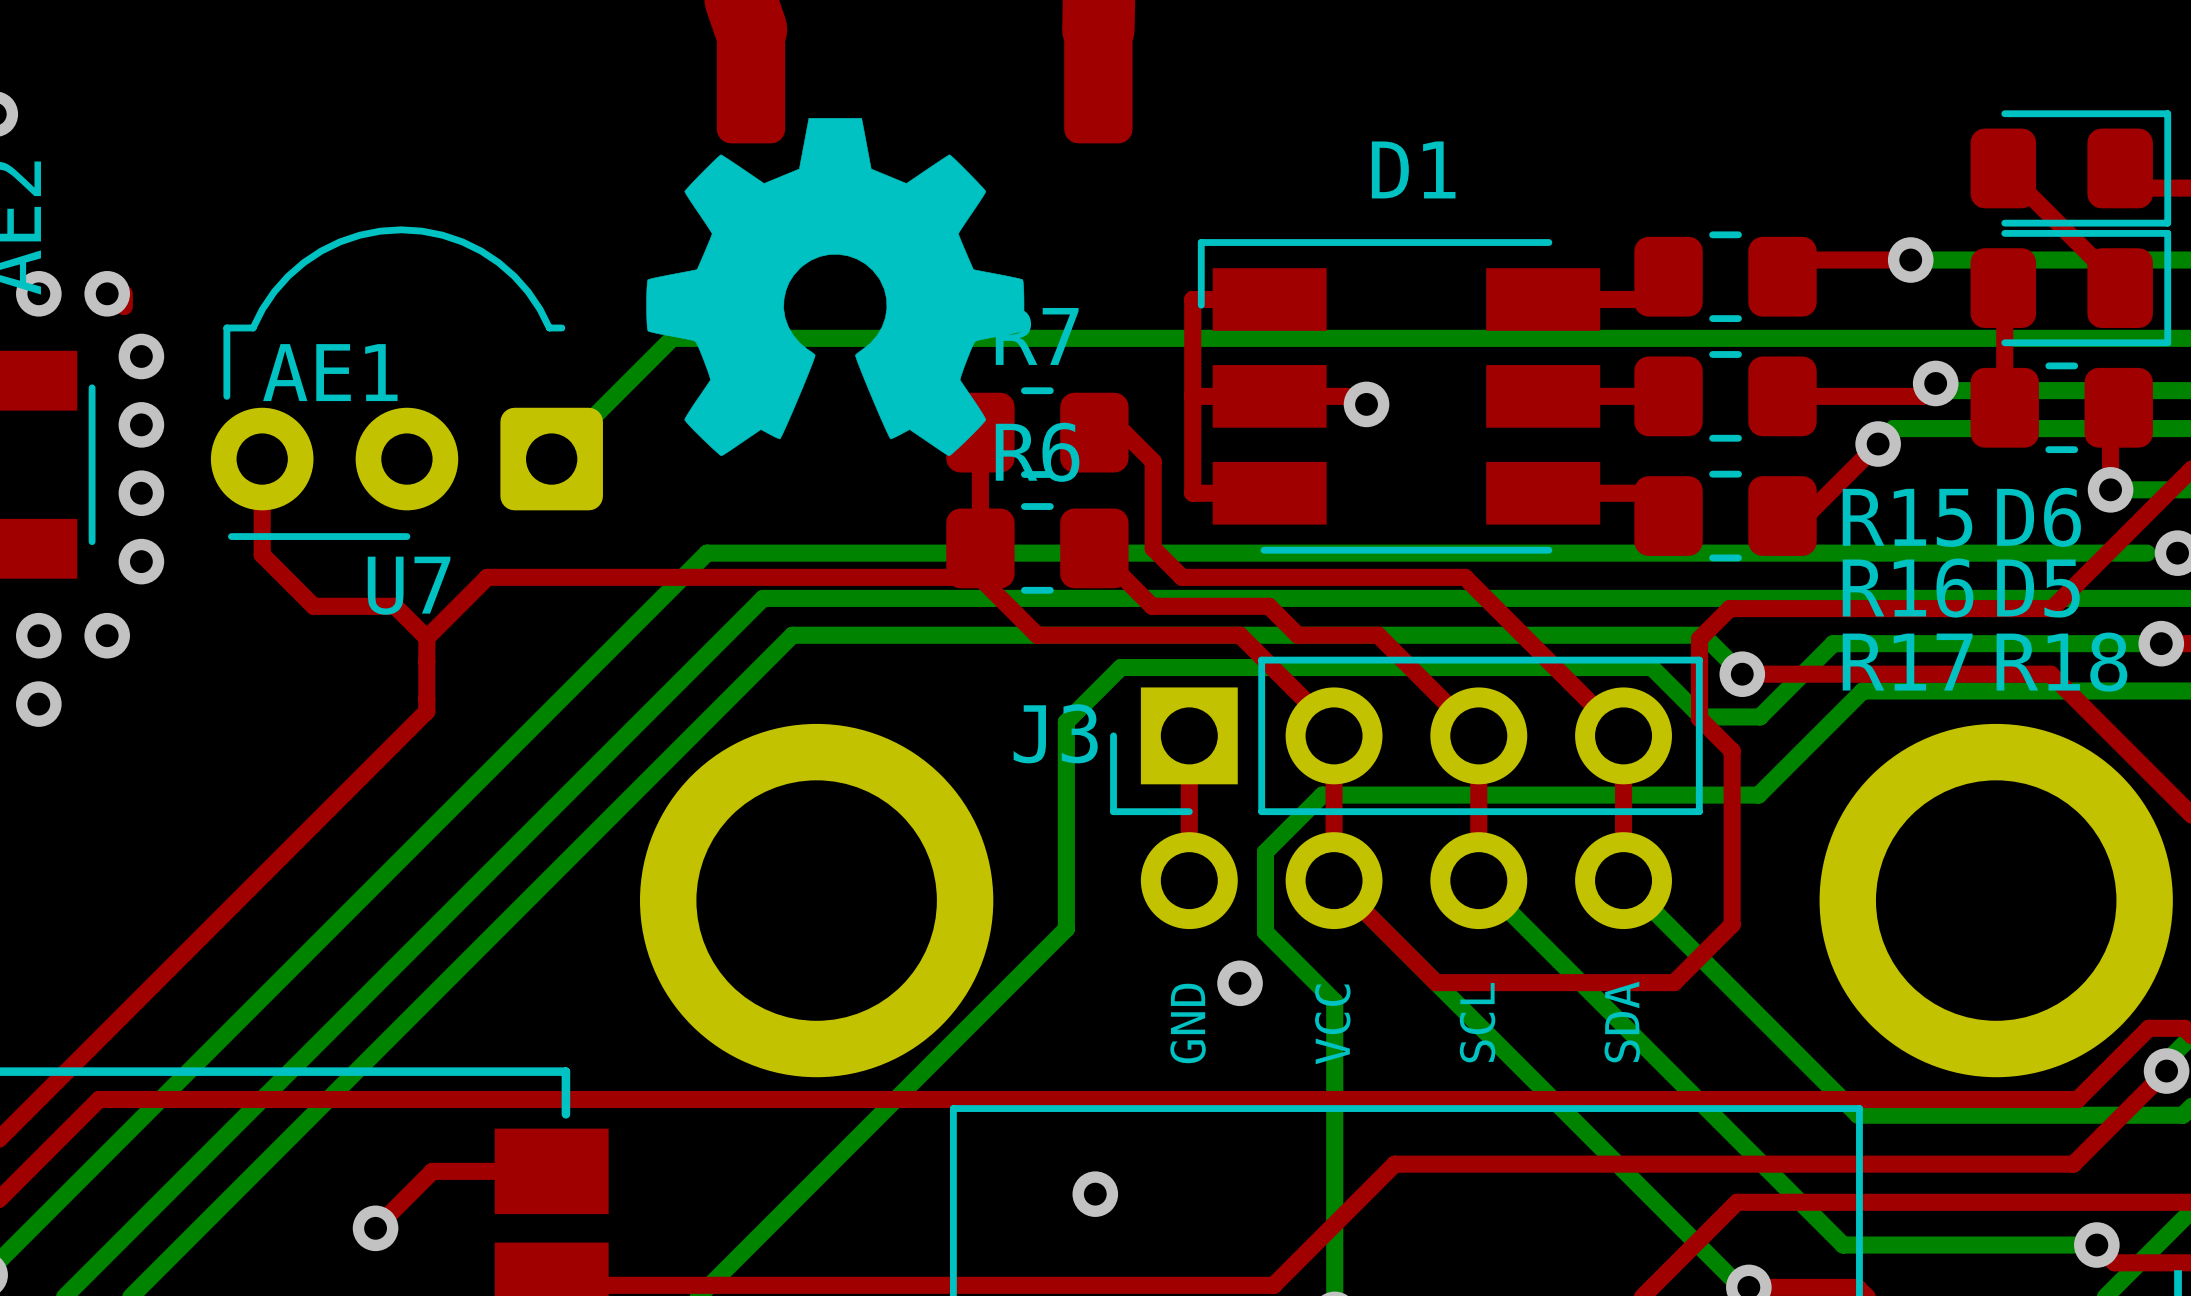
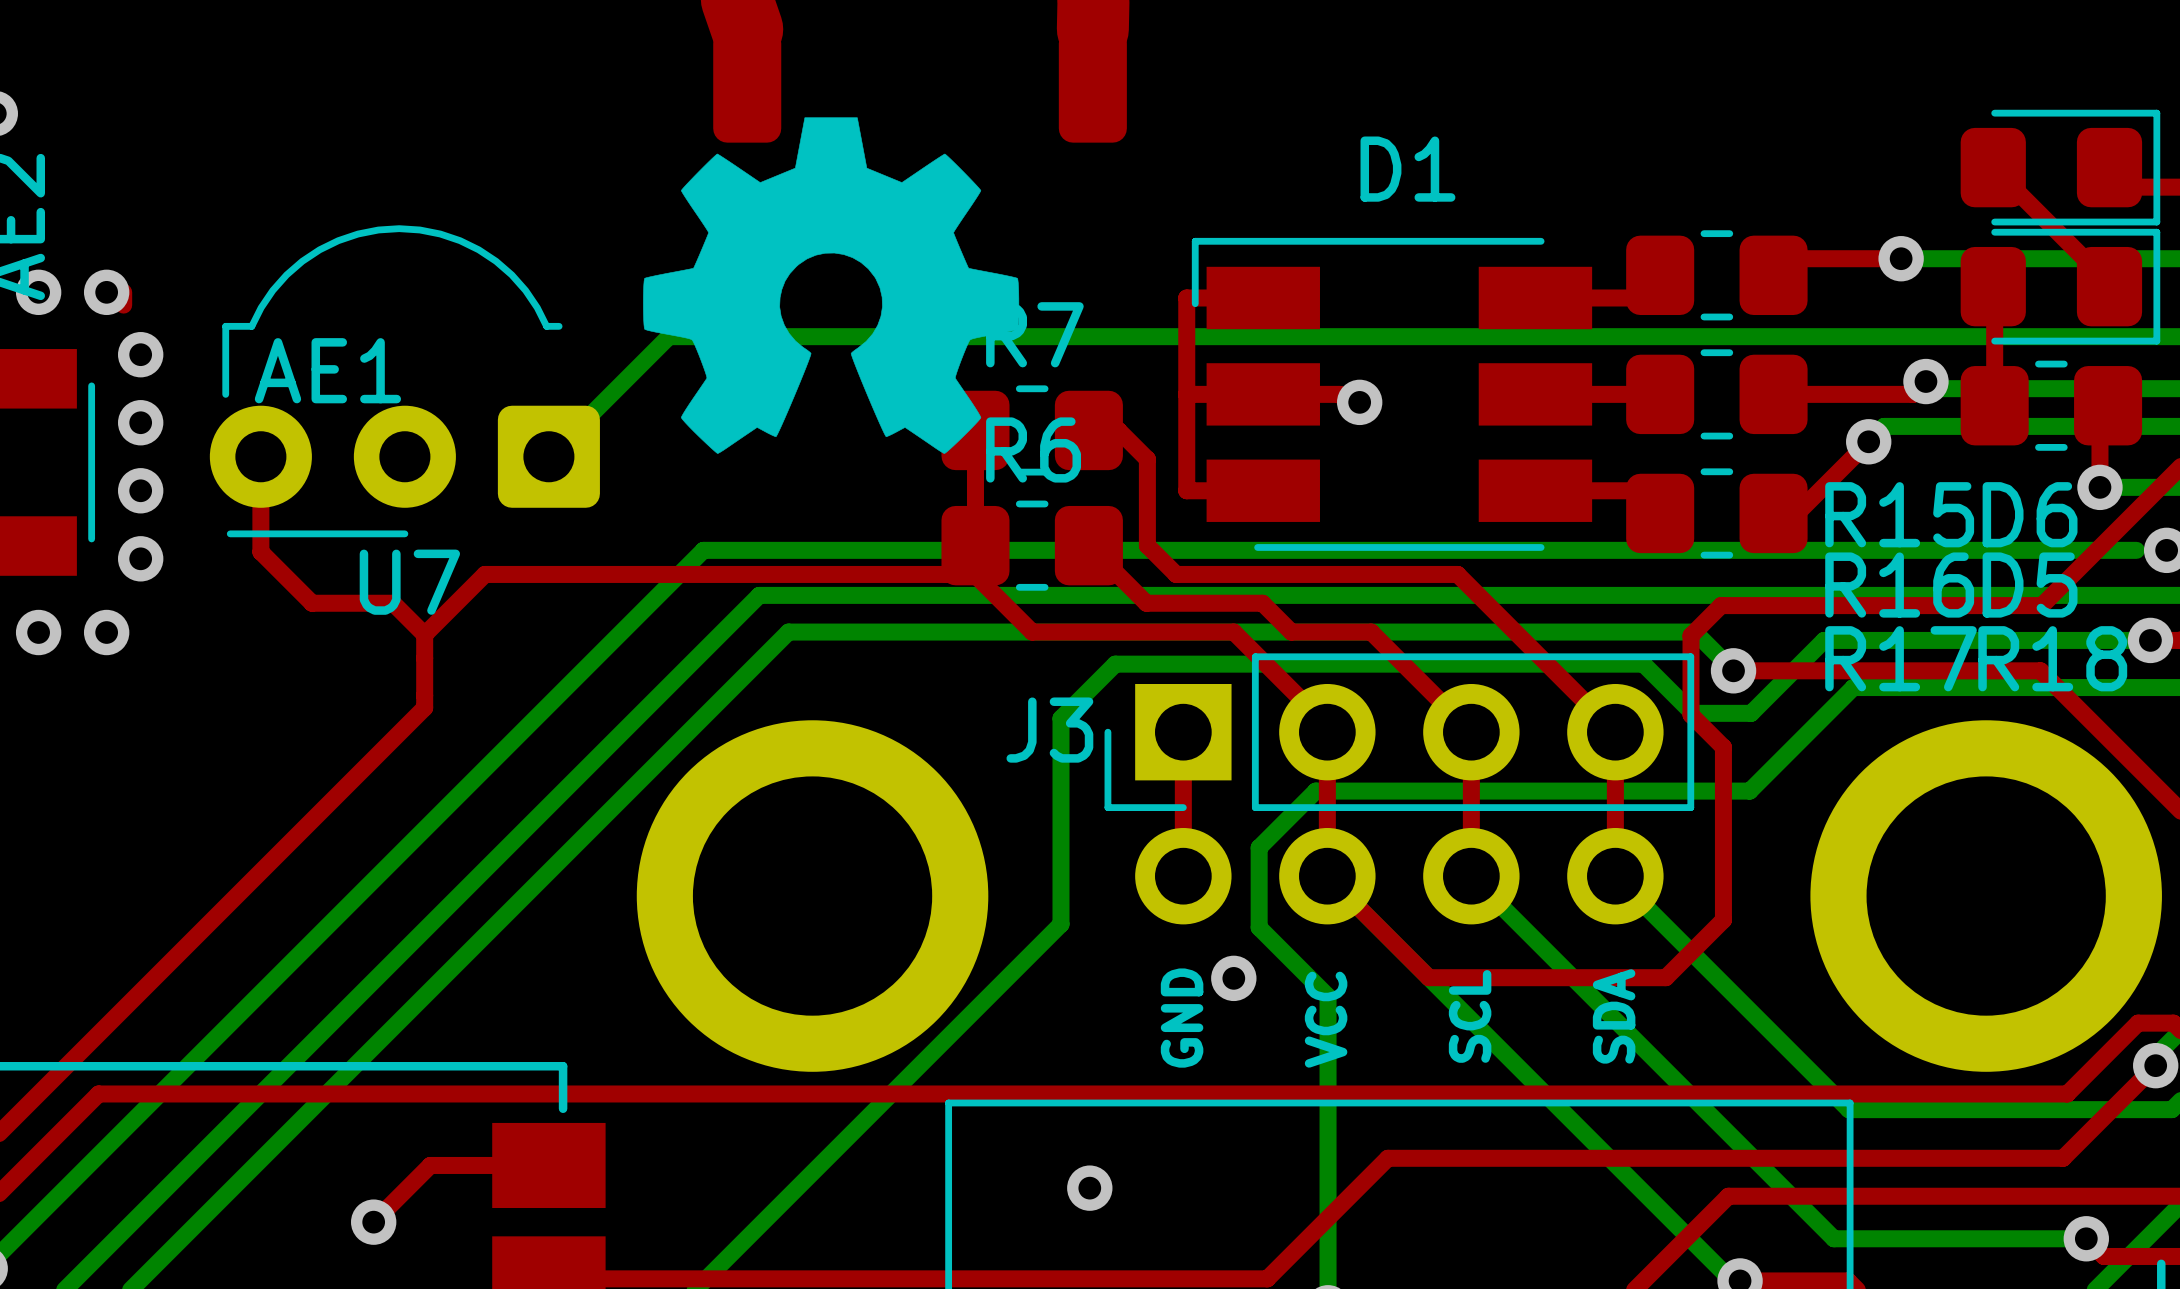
via: (38, 704) -> none

